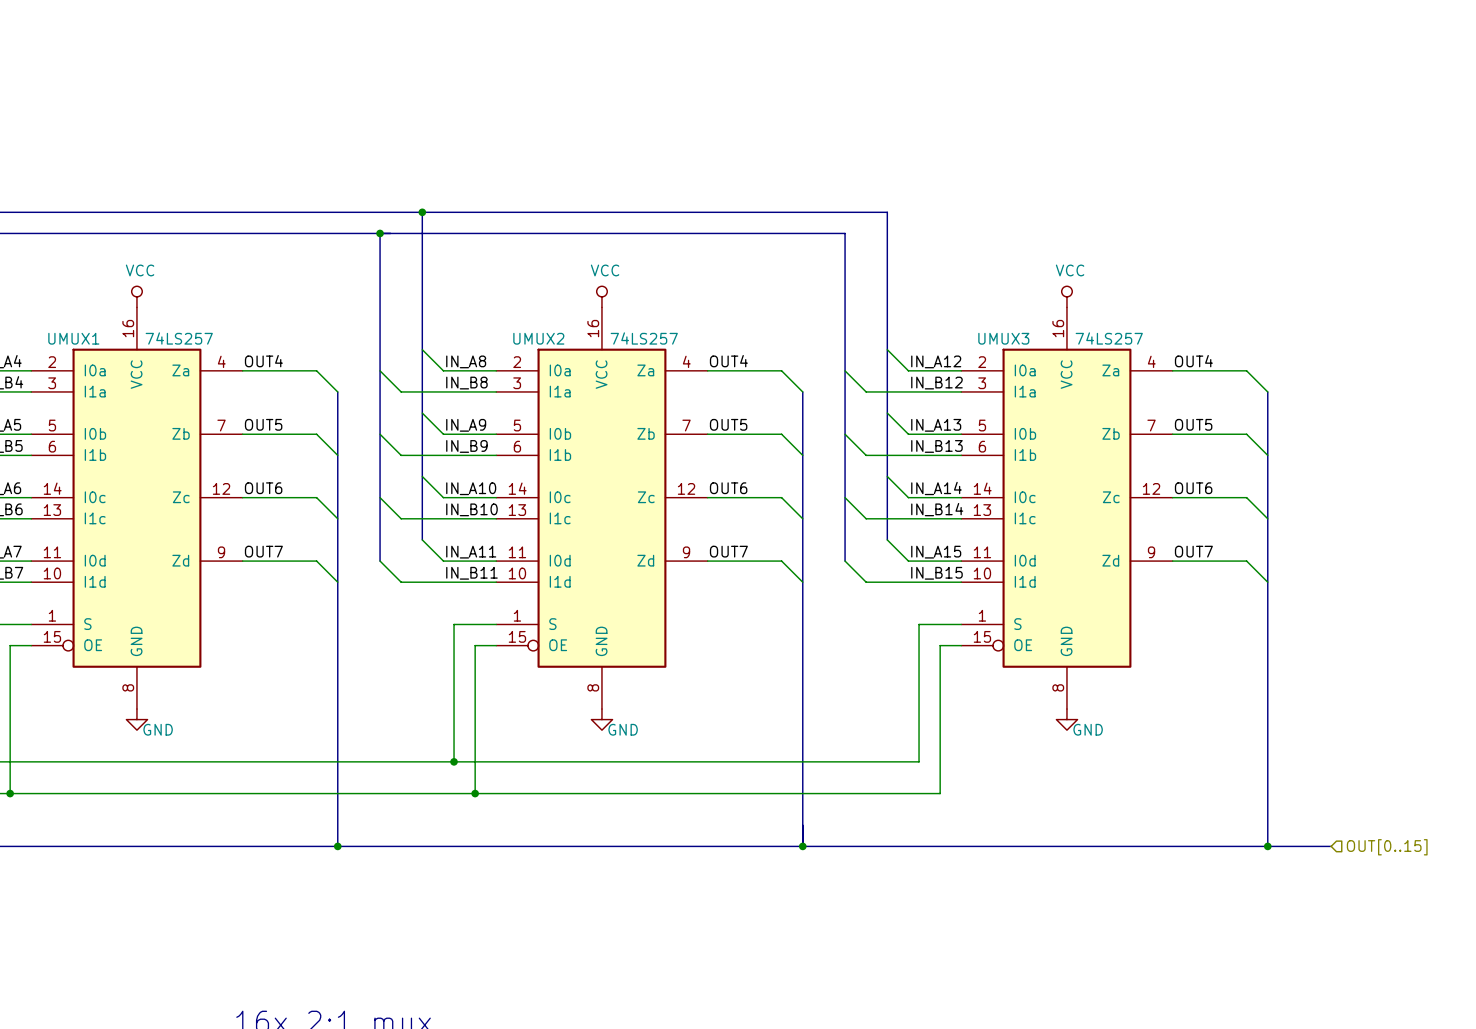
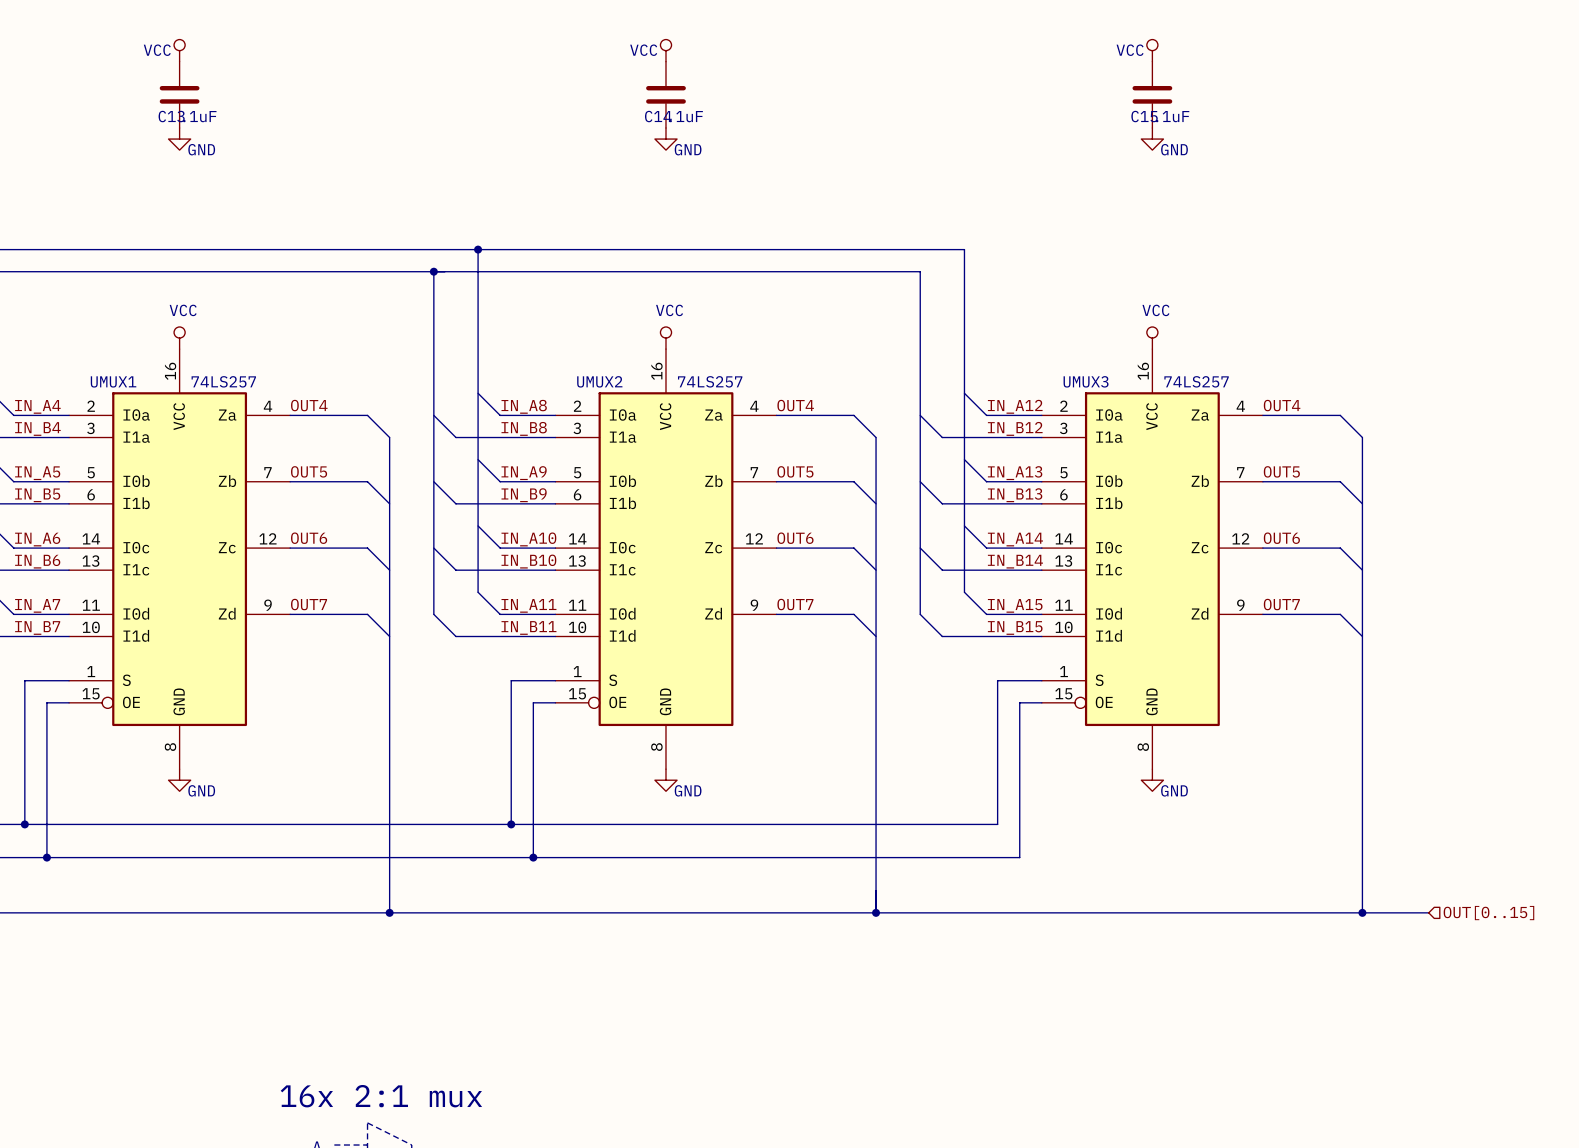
power symbol: none -> VCC (179, 50)
power symbol: none -> VCC (665, 50)
power symbol: none -> VCC (1152, 50)
C13: none -> .1uF (179, 94)
C14: none -> .1uF (665, 94)
C15: none -> .1uF (1152, 94)
power symbol: none -> GND (179, 139)
power symbol: none -> GND (665, 139)
power symbol: none -> GND (1152, 139)

